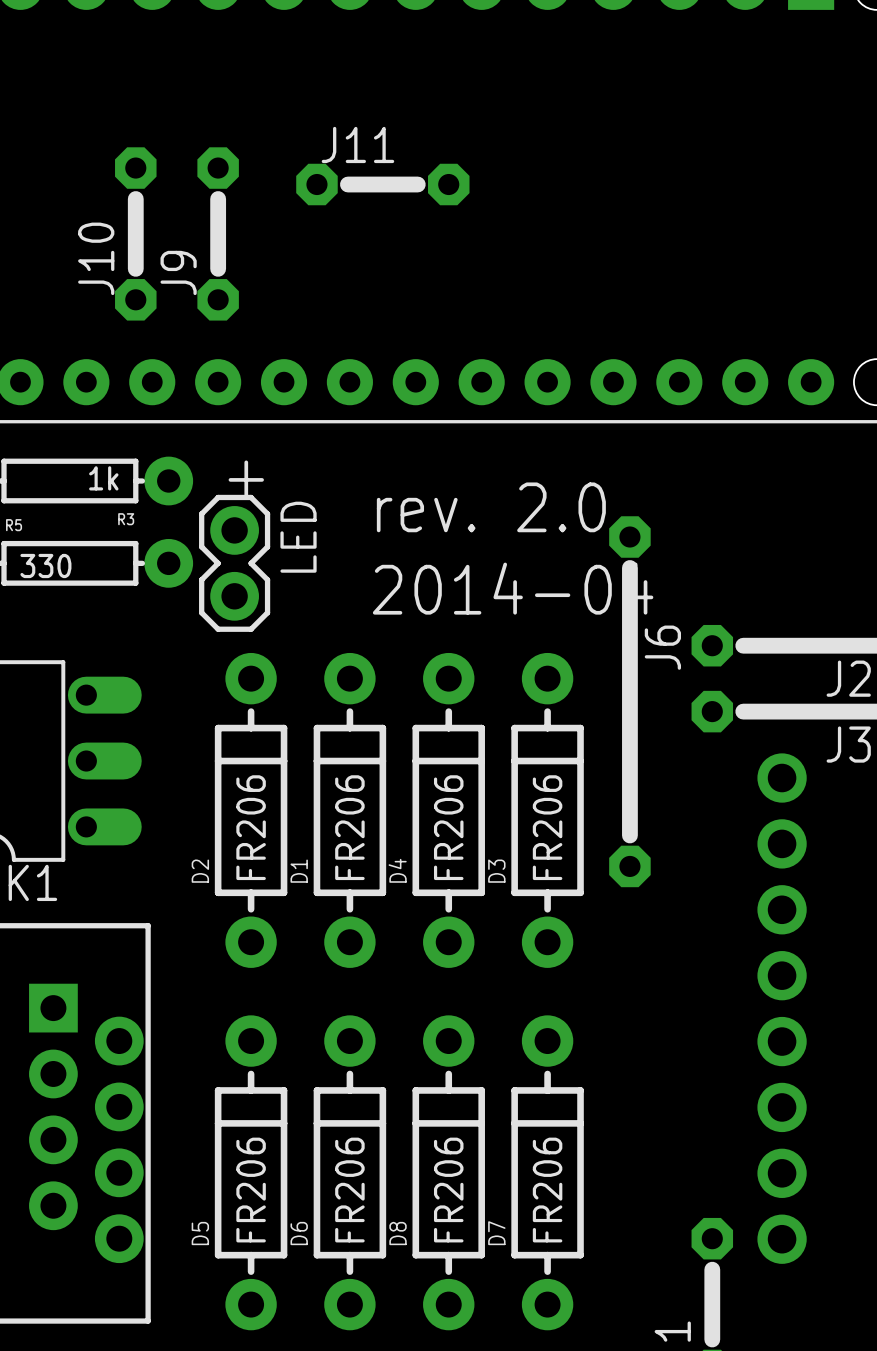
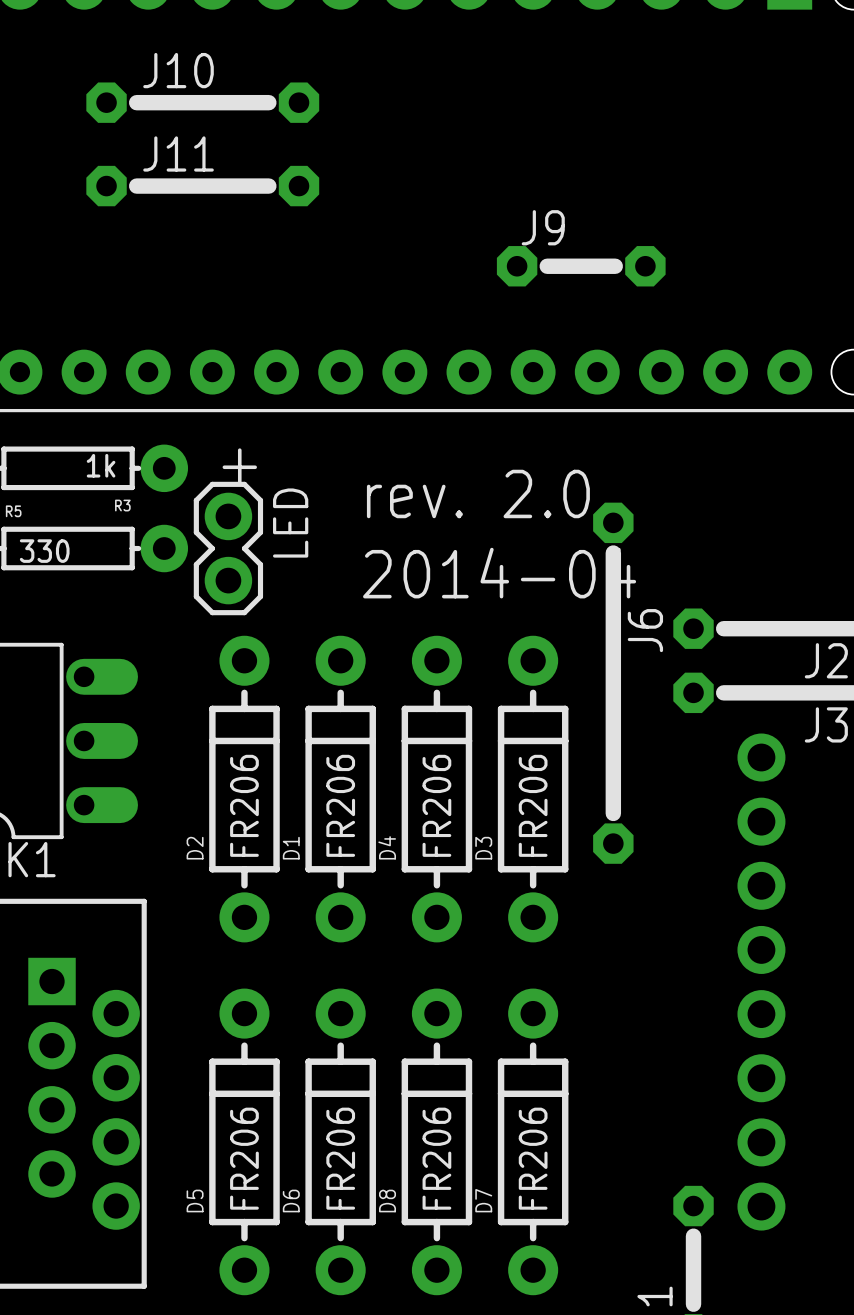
J10 footprint: [115, 147, 157, 321] -> [86, 82, 320, 123]
J11 footprint: [296, 163, 470, 206] -> [86, 165, 320, 207]
J9 rotation: 0° (218, 233) -> 90° clockwise (581, 266)
J9 position: (218, 233) -> (581, 266)
J10 name position: J10 (96, 258) -> J10 (178, 70)

